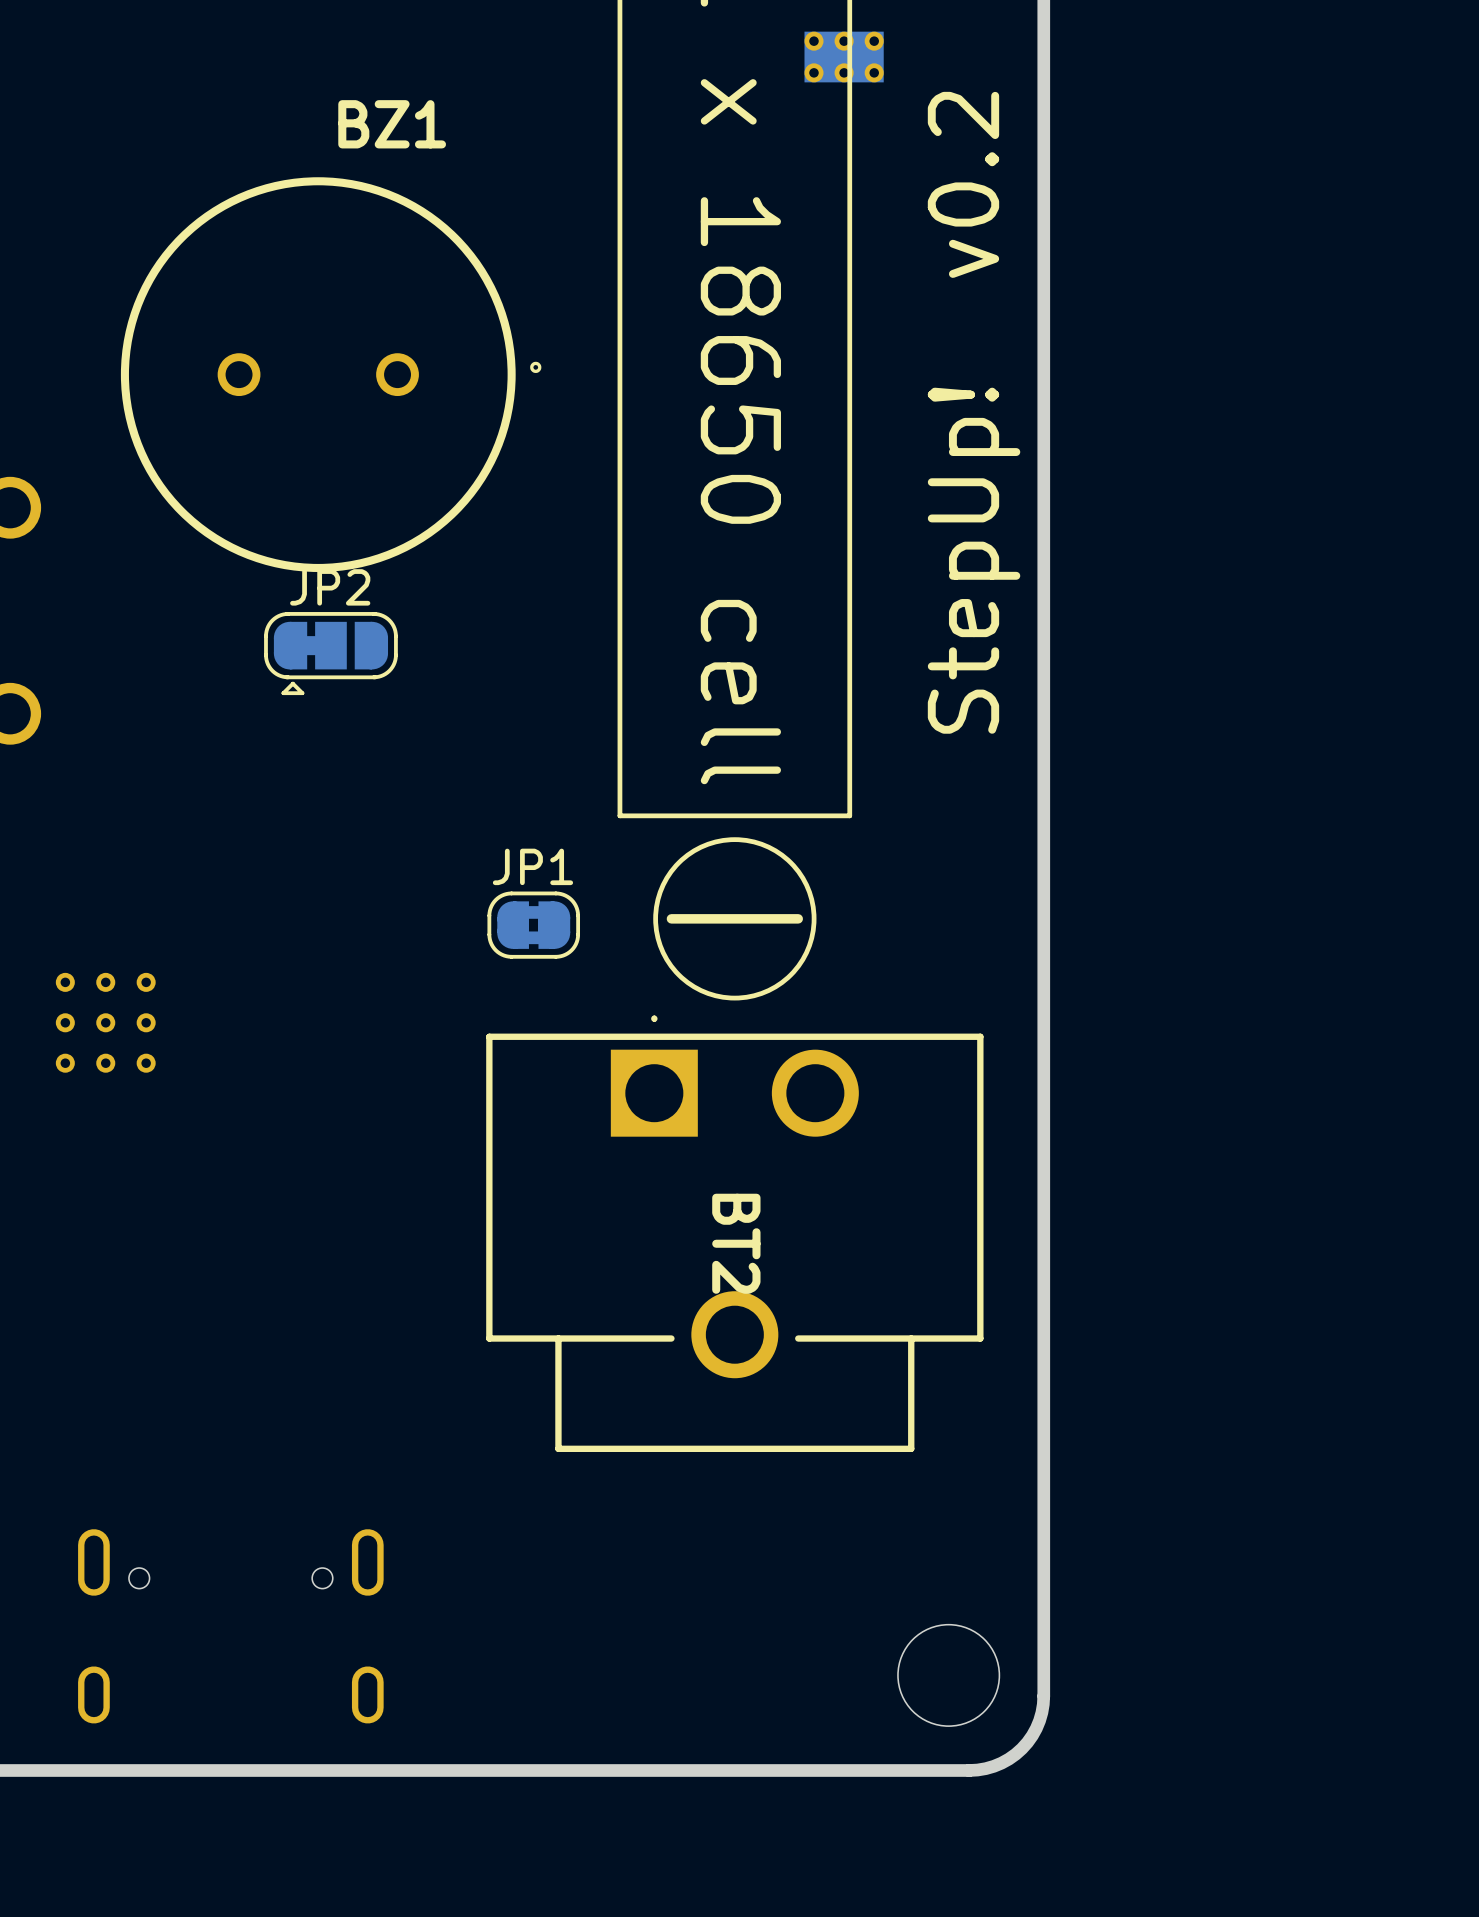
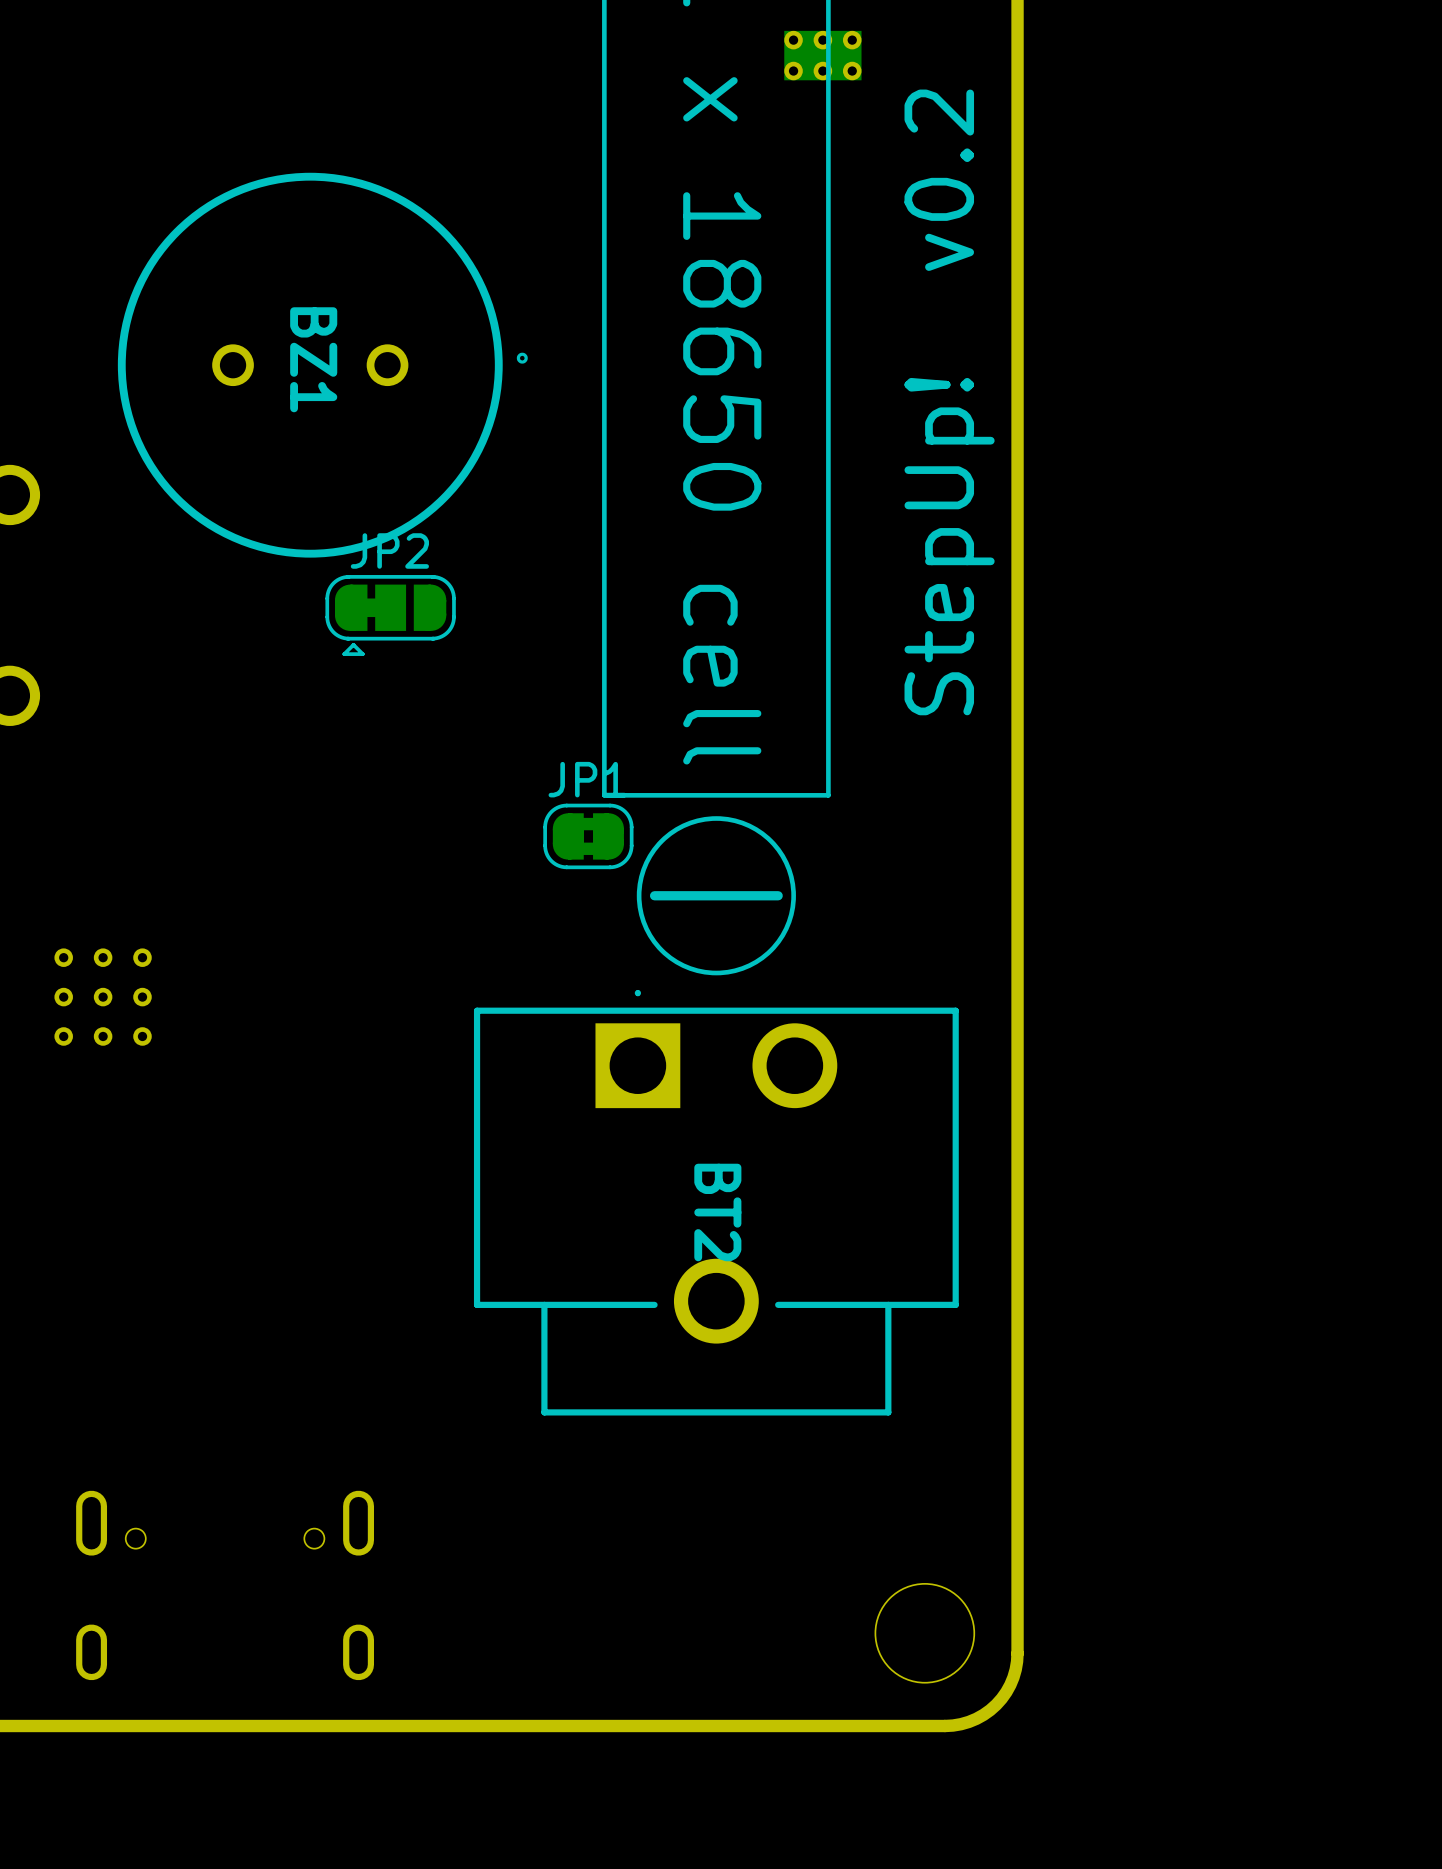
BZ1 name rotation: 0° (392, 124) -> 90° clockwise (313, 359)
BZ1 name position: BZ1 (392, 124) -> BZ1 (313, 359)
JP2 position: (330, 653) -> (390, 615)
JP1 position: (533, 925) -> (588, 836)

